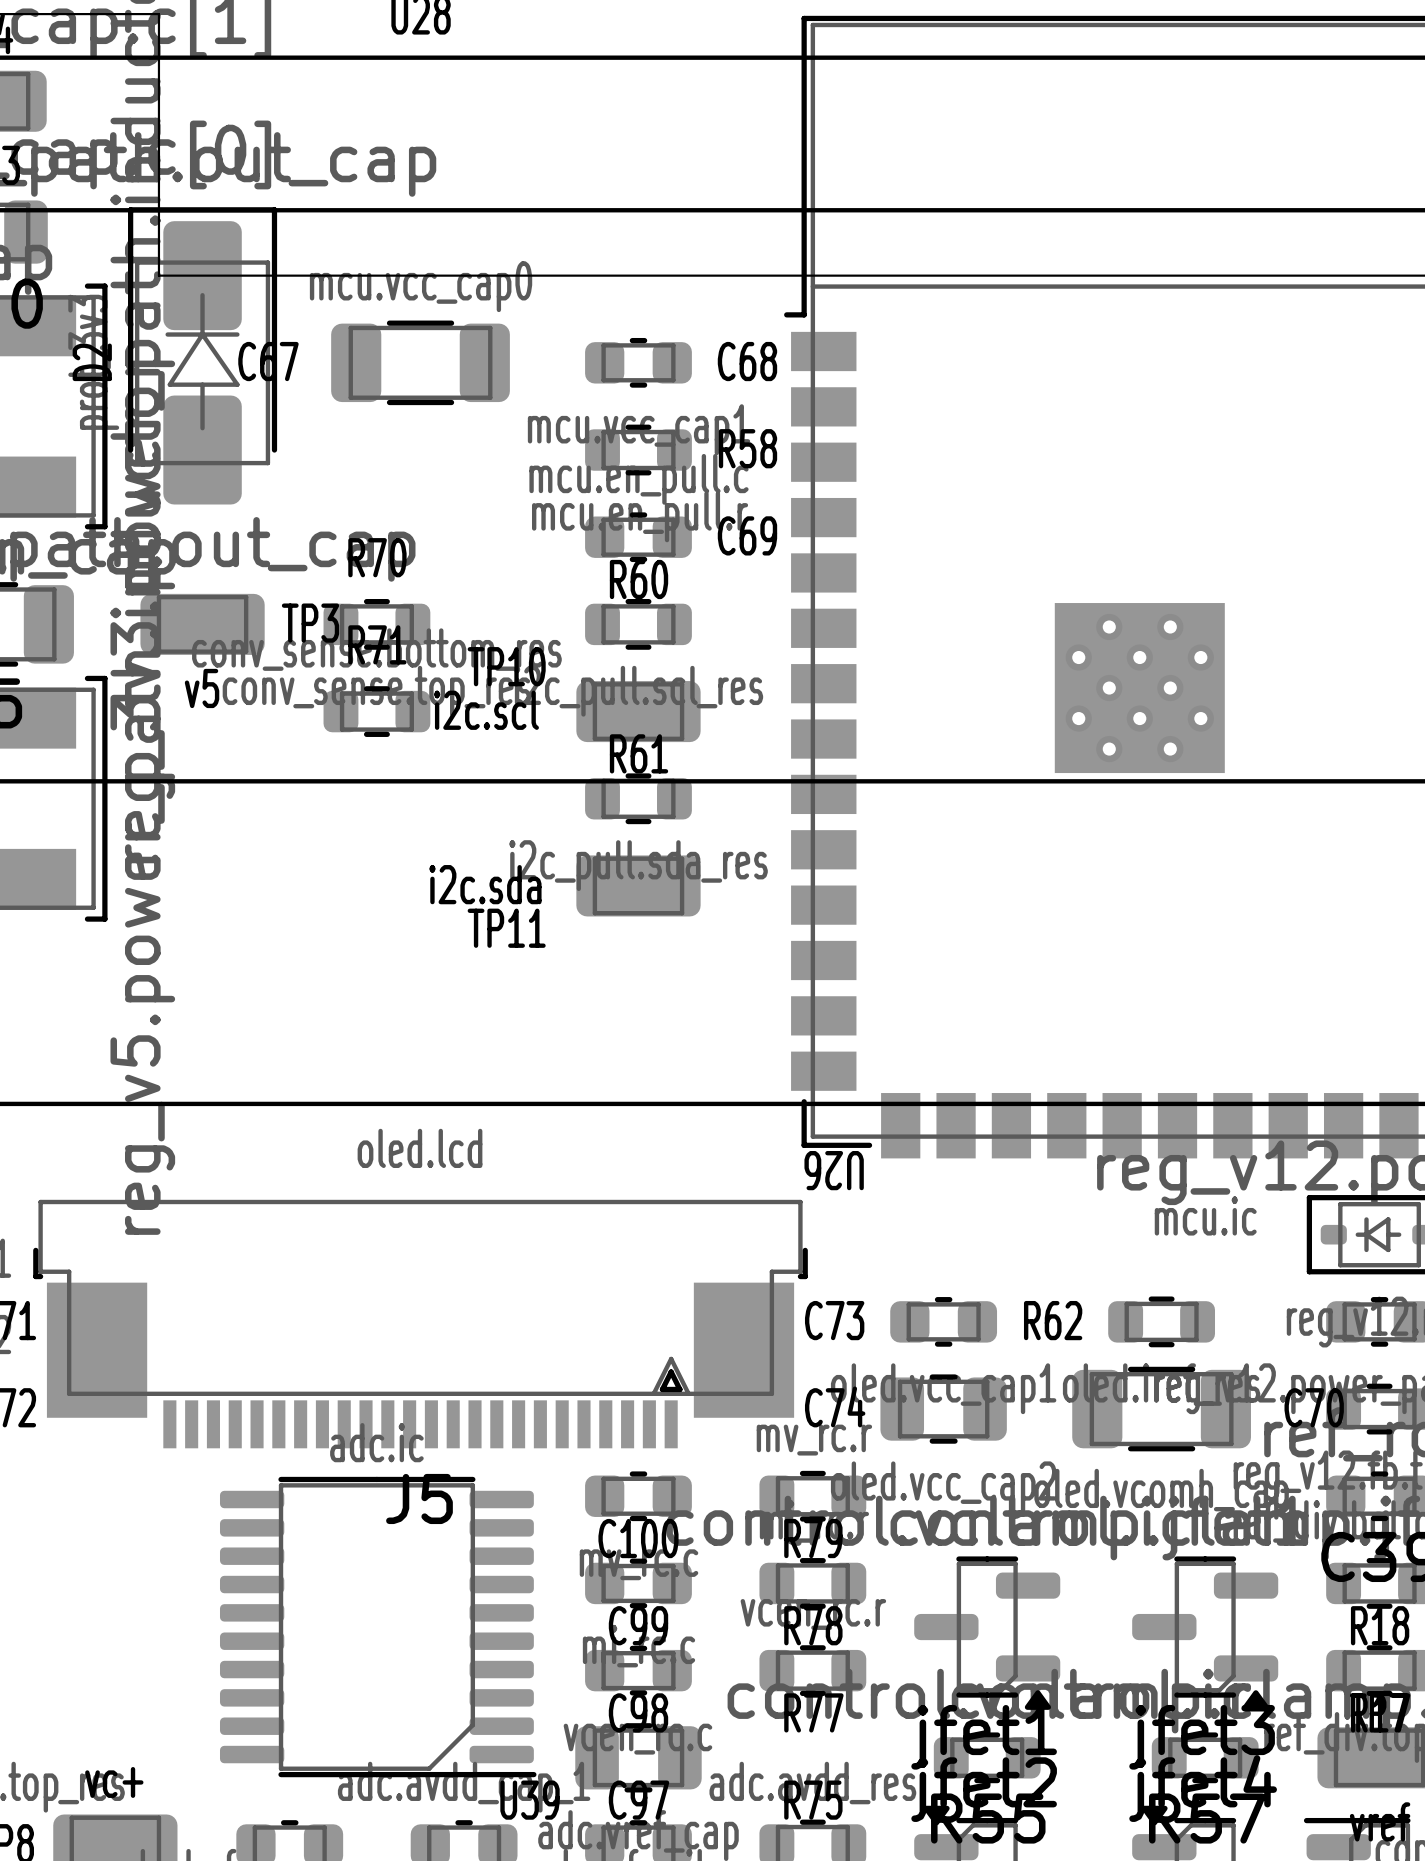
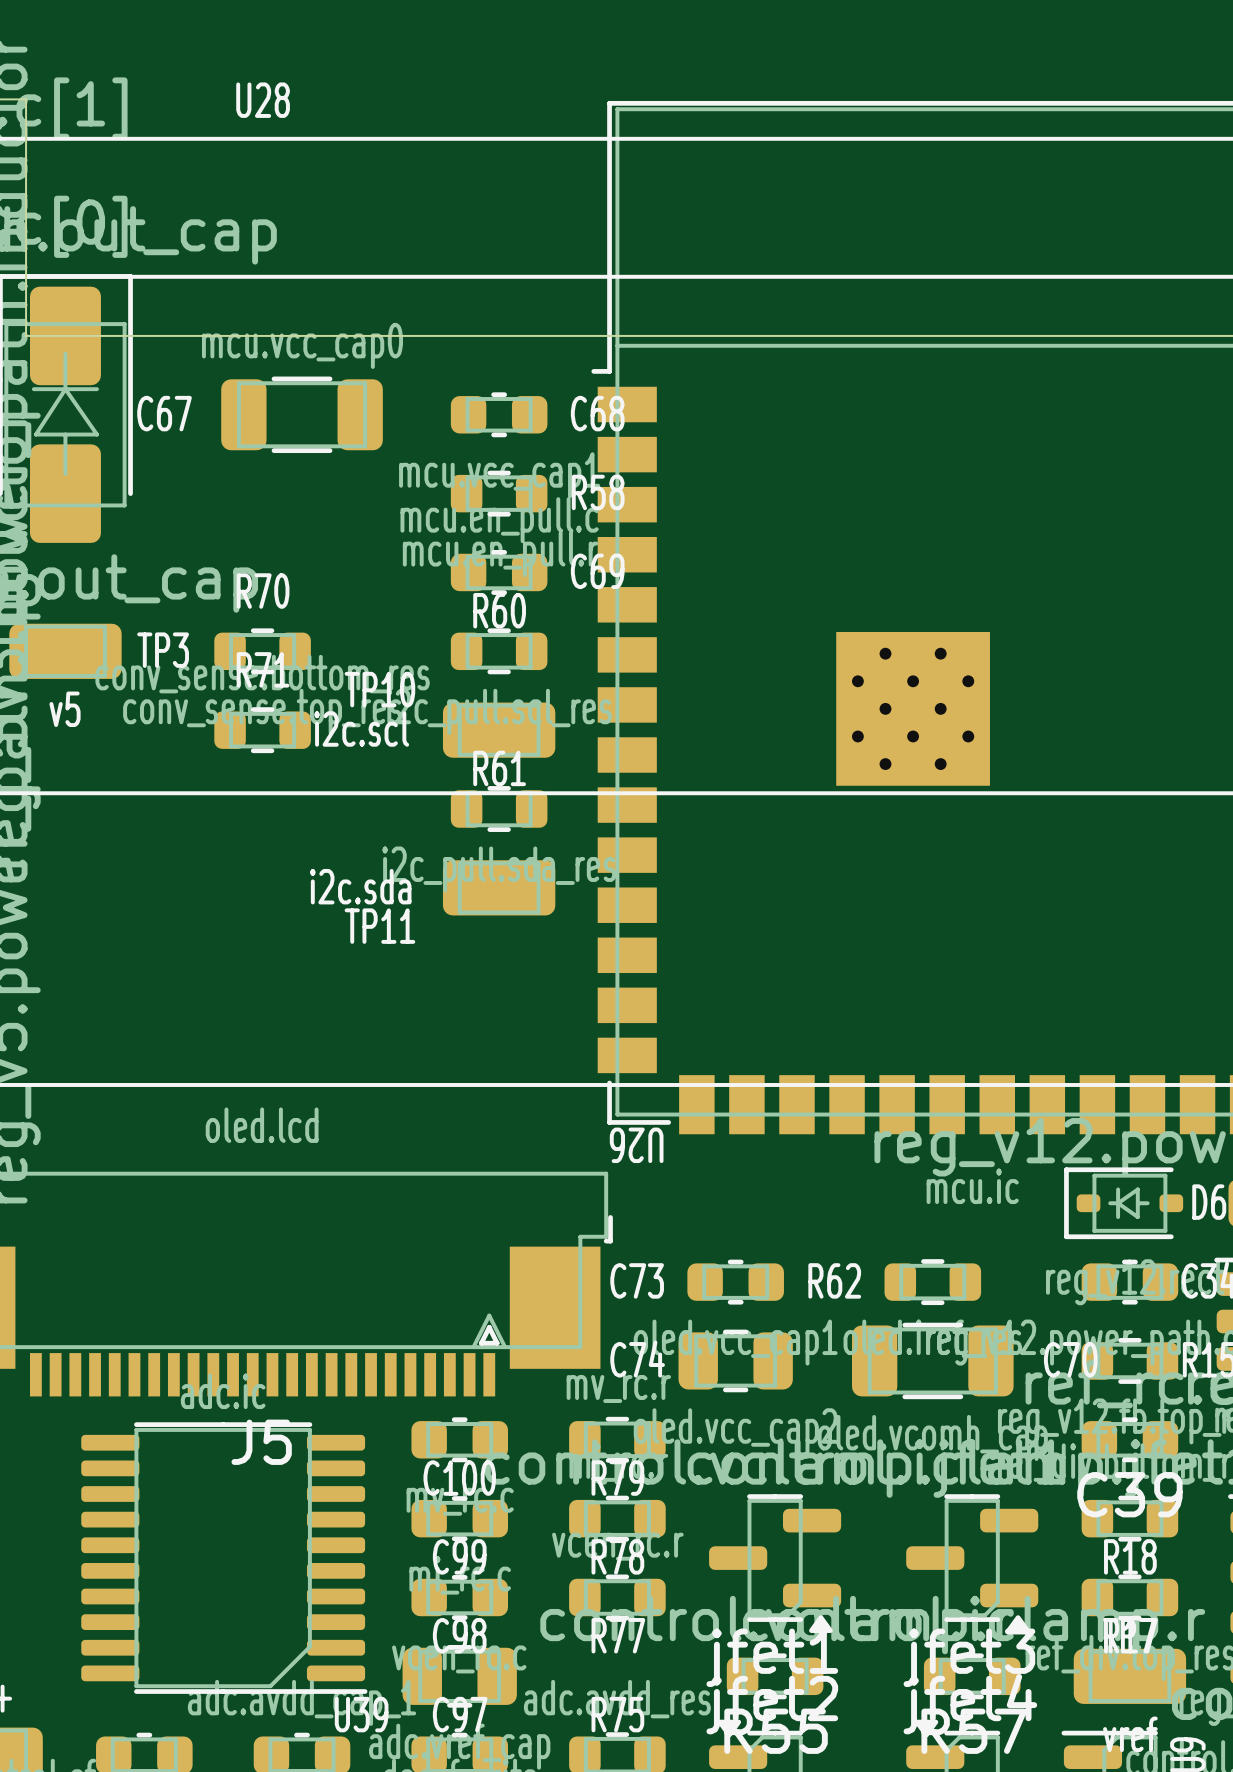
C67 position: (420, 362) -> (302, 414)
C68 position: (638, 362) -> (499, 414)
R58 position: (638, 450) -> (499, 493)
C69 position: (638, 537) -> (499, 572)
R70 position: (376, 624) -> (262, 651)
R60 position: (638, 624) -> (499, 651)
R71 position: (376, 711) -> (262, 730)
TP10 position: (638, 711) -> (499, 730)
R61 position: (638, 798) -> (499, 809)
TP11 position: (638, 885) -> (499, 887)

